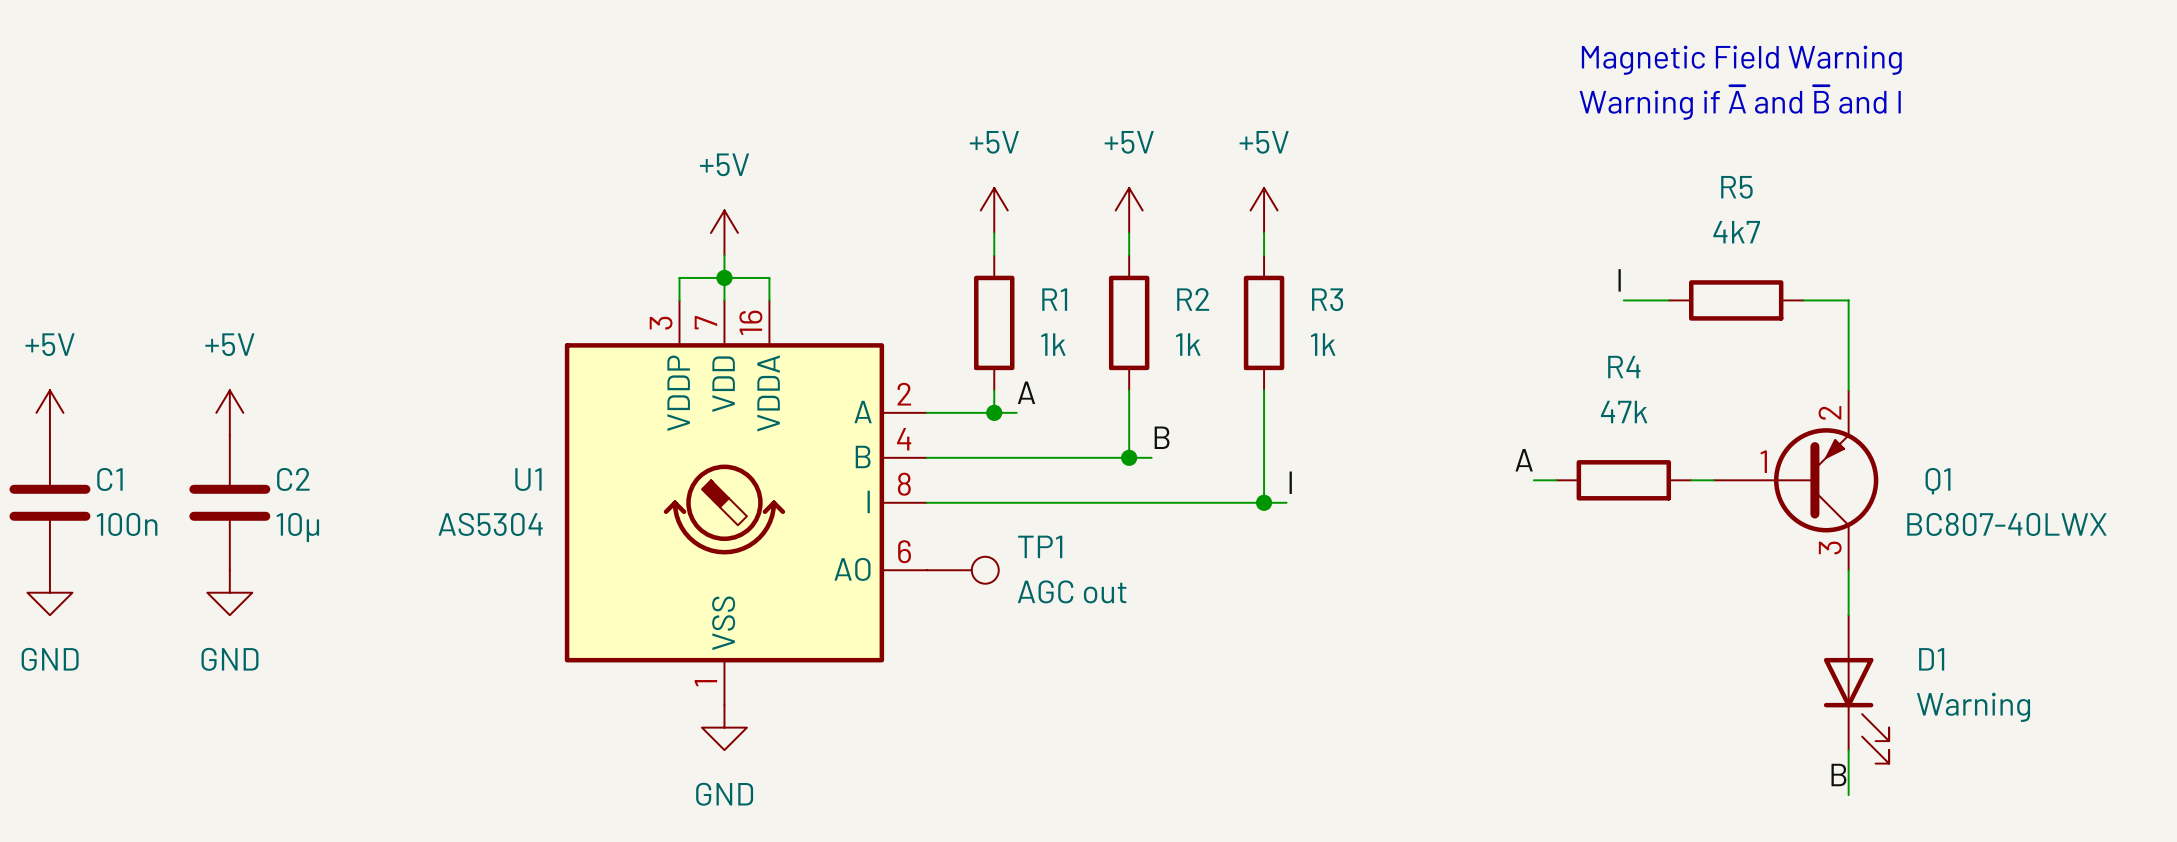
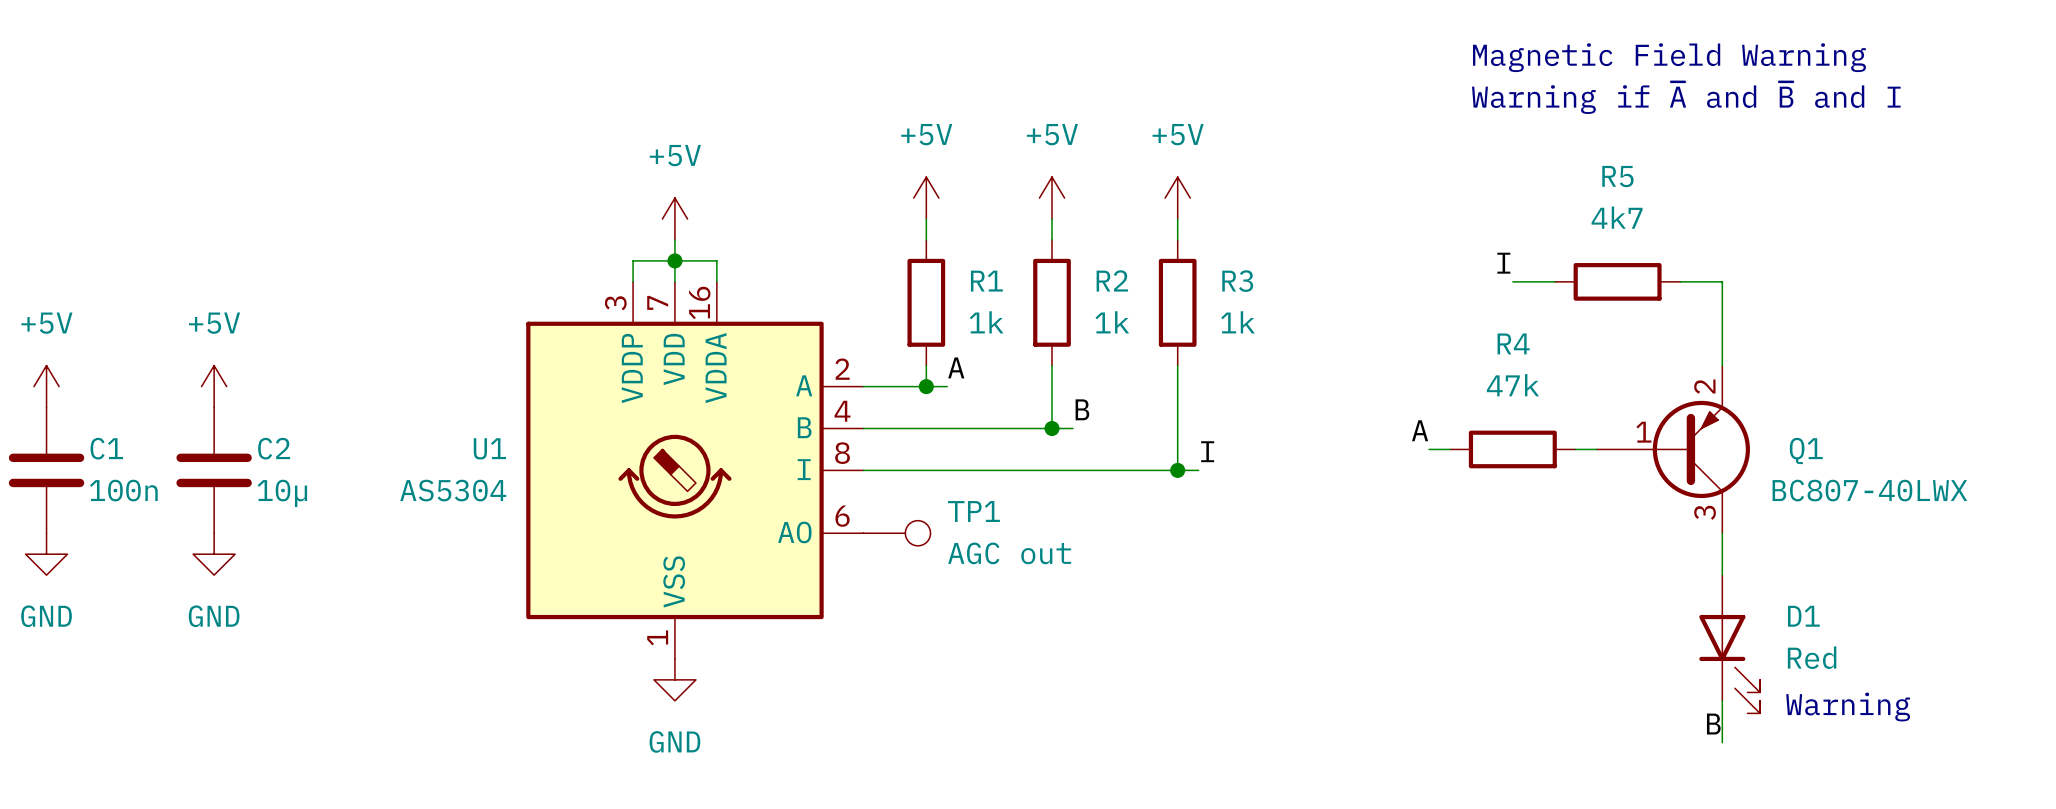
D1 value: Warning (1973, 707) -> Red (1812, 657)
text: none -> Warning (1848, 707)

